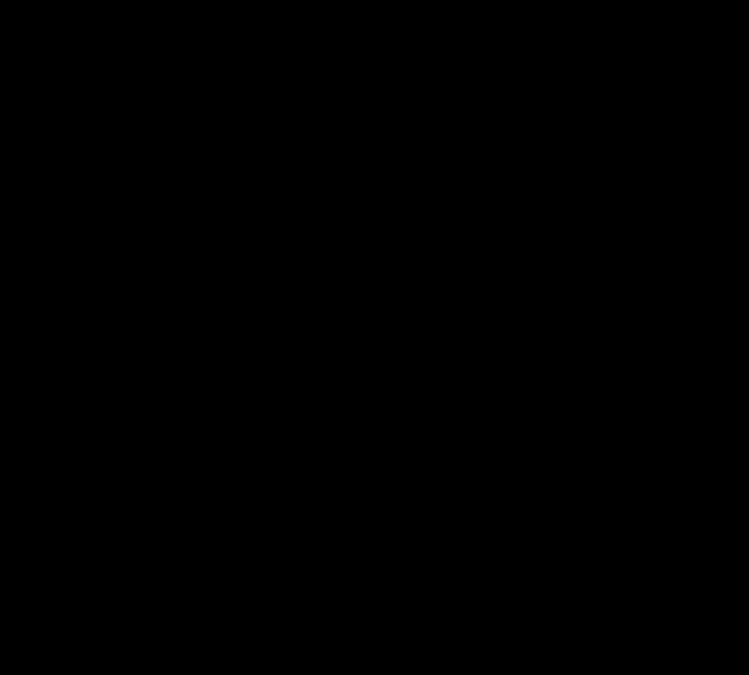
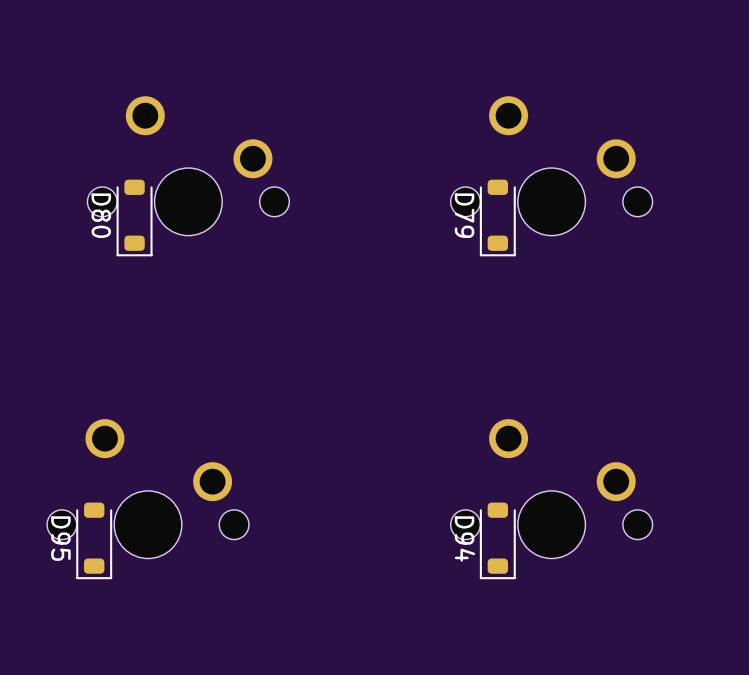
part: none -> (188, 165)
part: none -> (551, 165)
D80: none -> (134, 217)
D79: none -> (497, 217)
part: none -> (148, 488)
part: none -> (551, 488)
D95: none -> (94, 540)
D94: none -> (497, 540)

